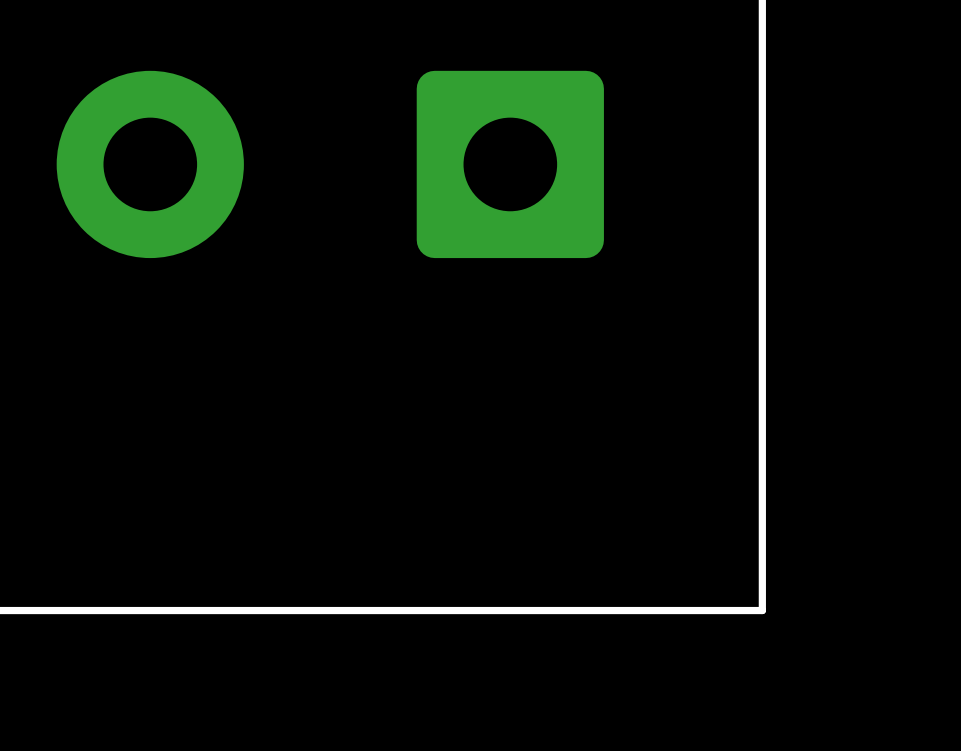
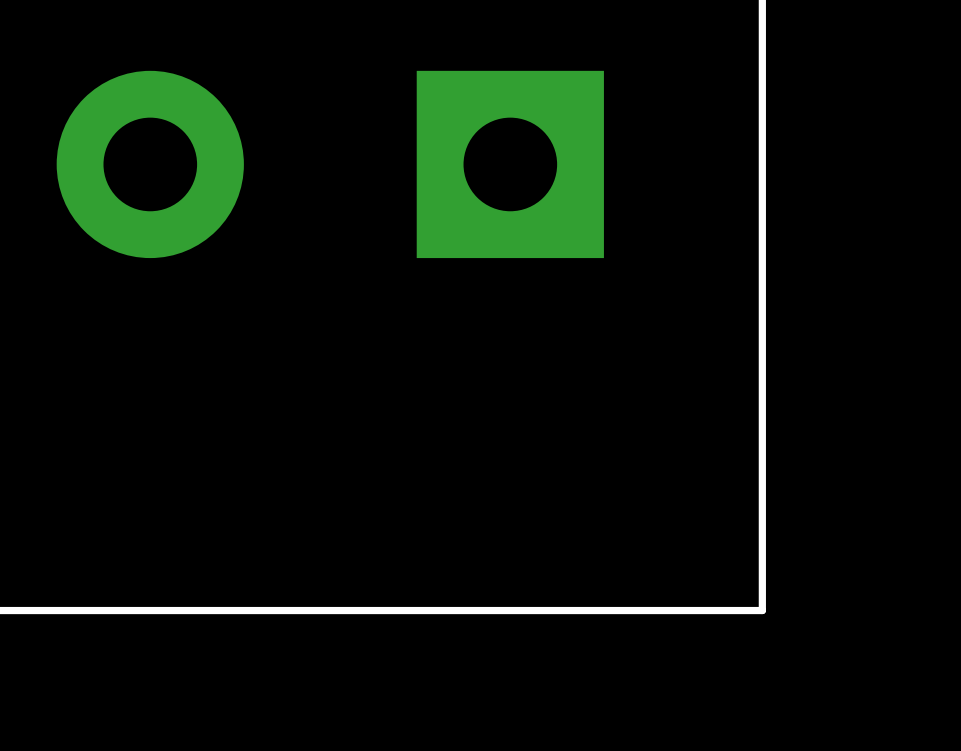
part footprint: [56, 70, 604, 259] -> [56, 70, 604, 259]

